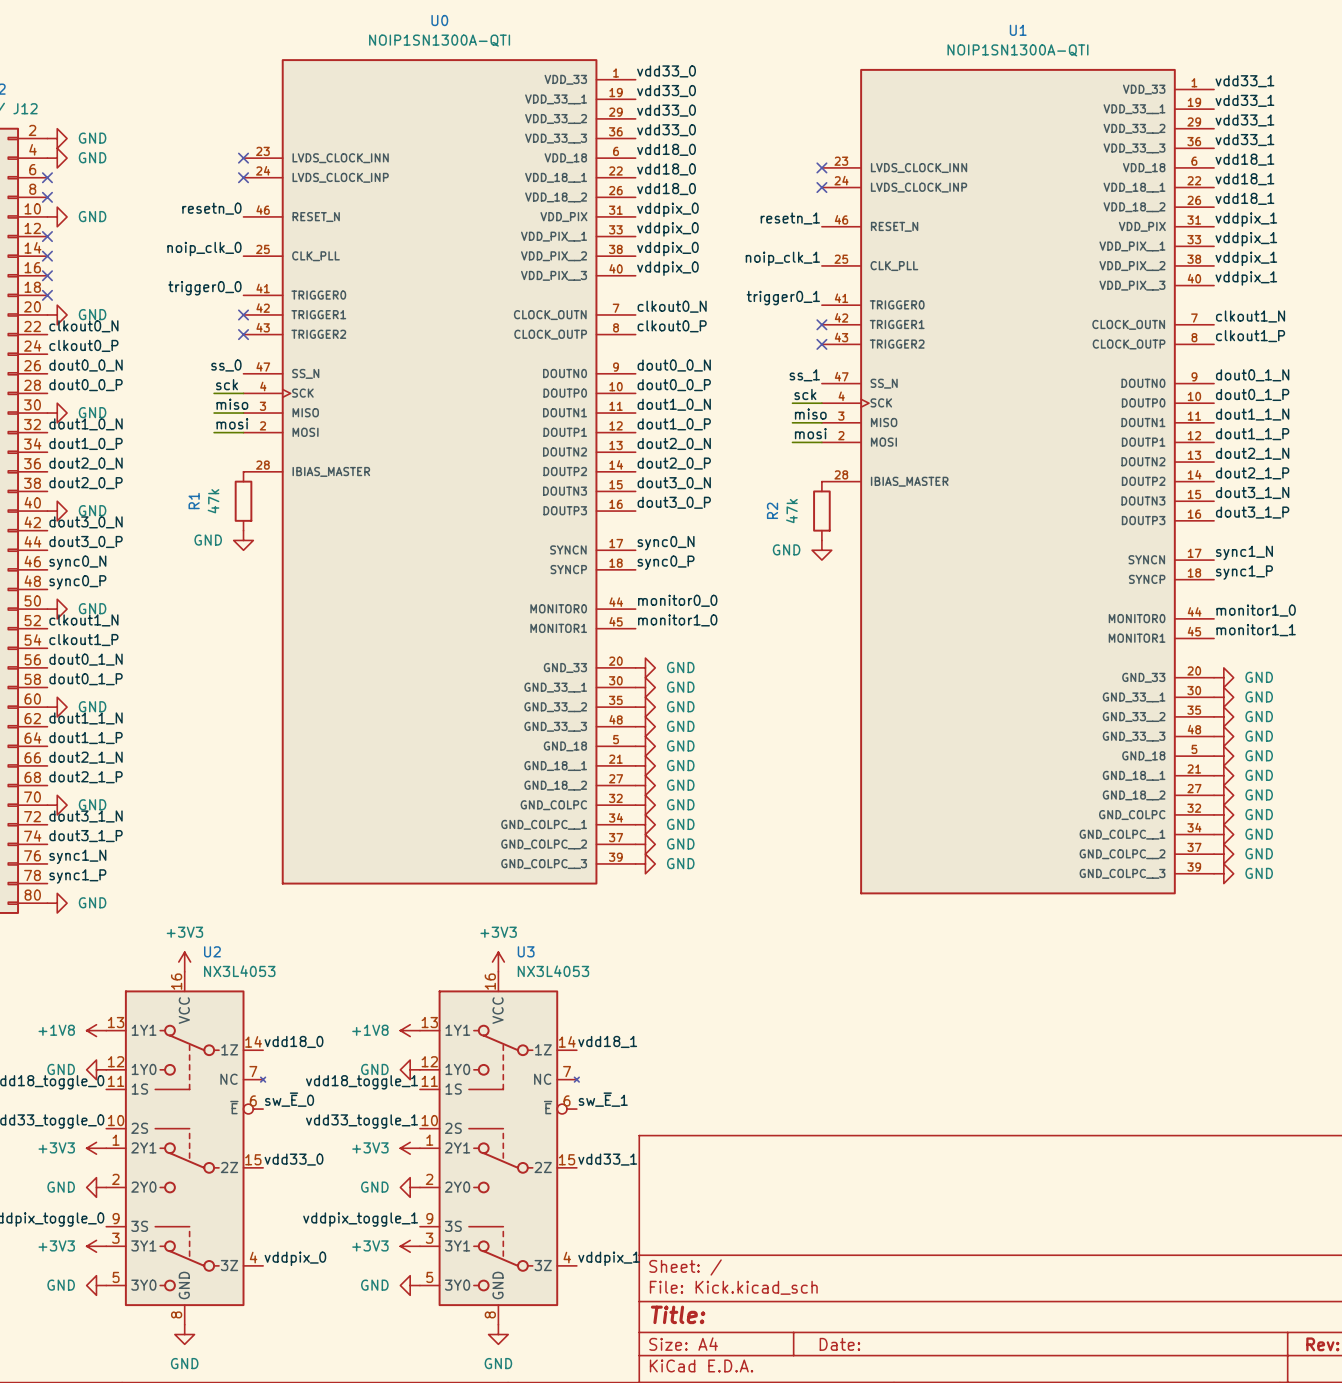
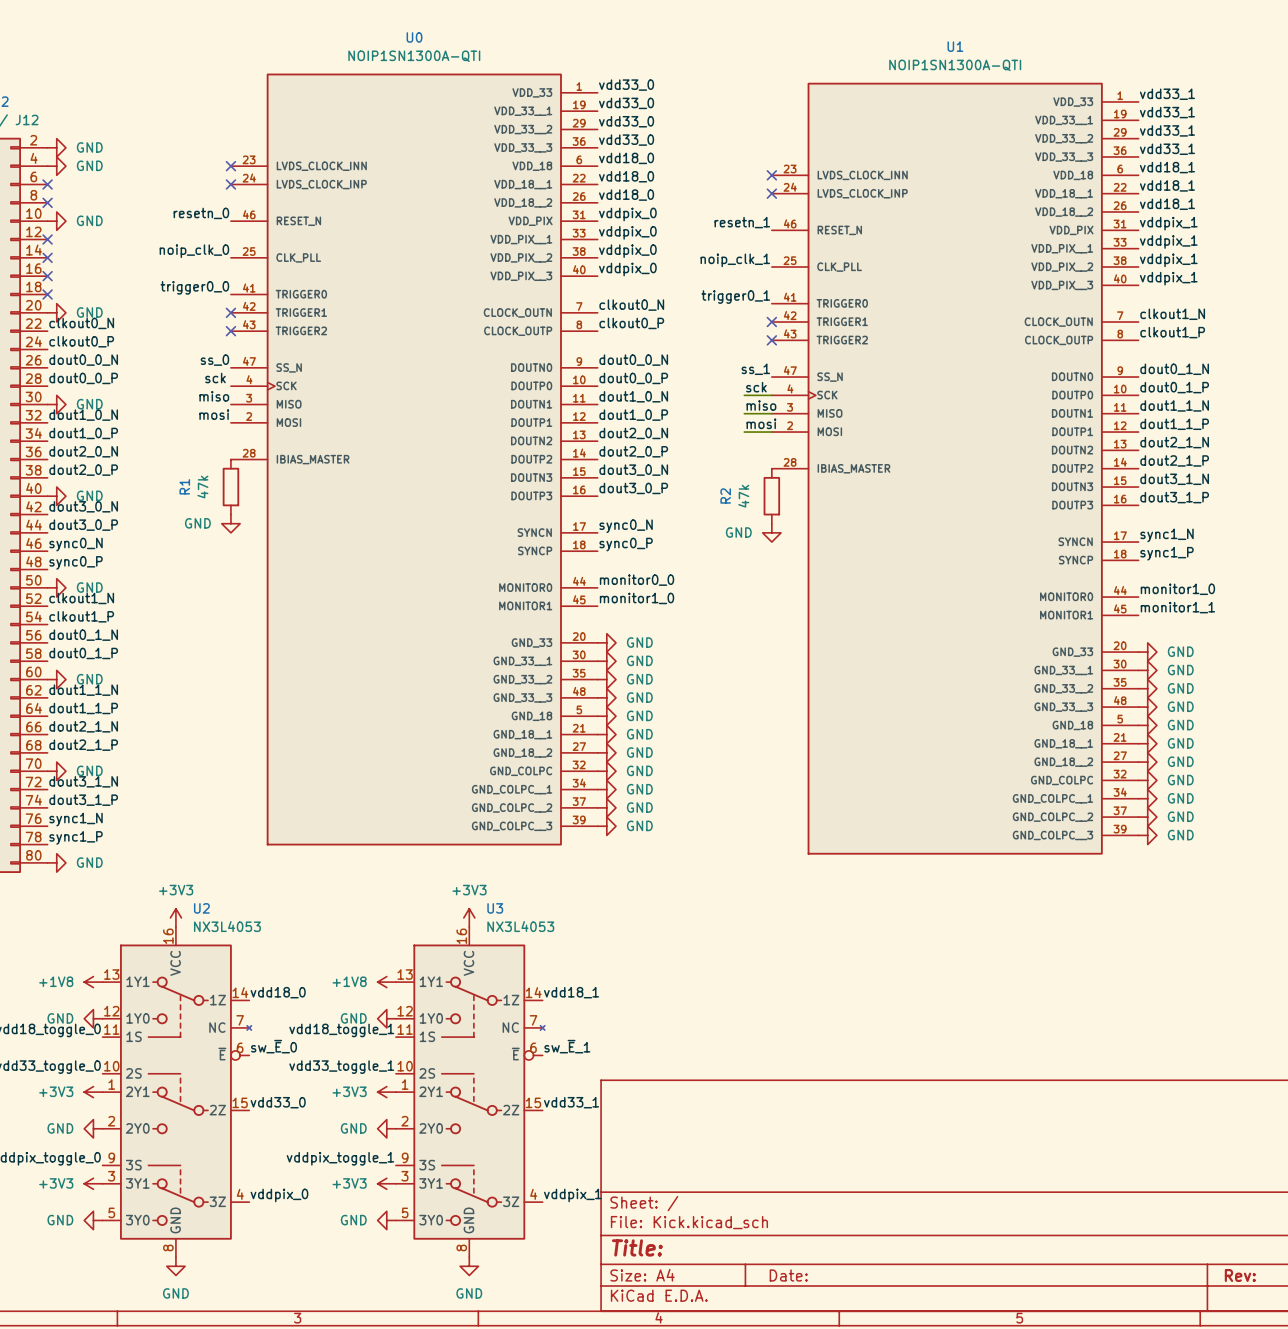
wire: (214, 393) (243, 393) -> none
label position: miso (232, 404) -> miso (214, 396)
wire: (214, 413) (243, 413) -> none
label position: mosi (232, 423) -> mosi (214, 414)
wire: (214, 432) (243, 432) -> none

